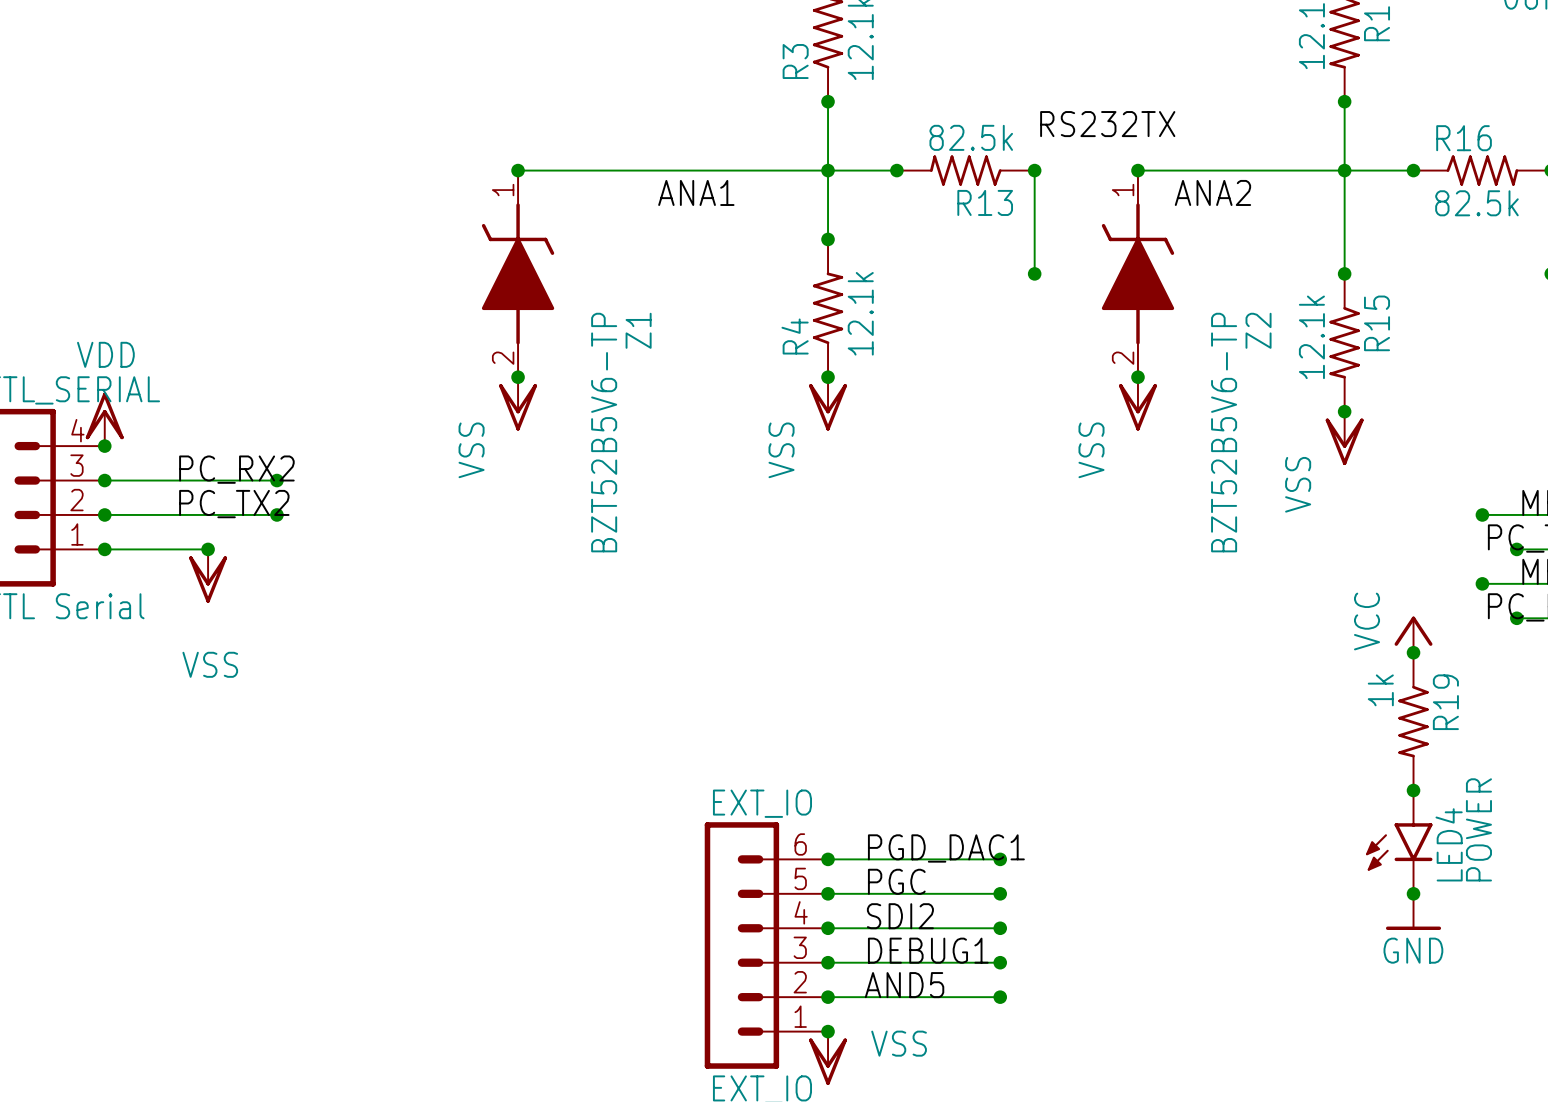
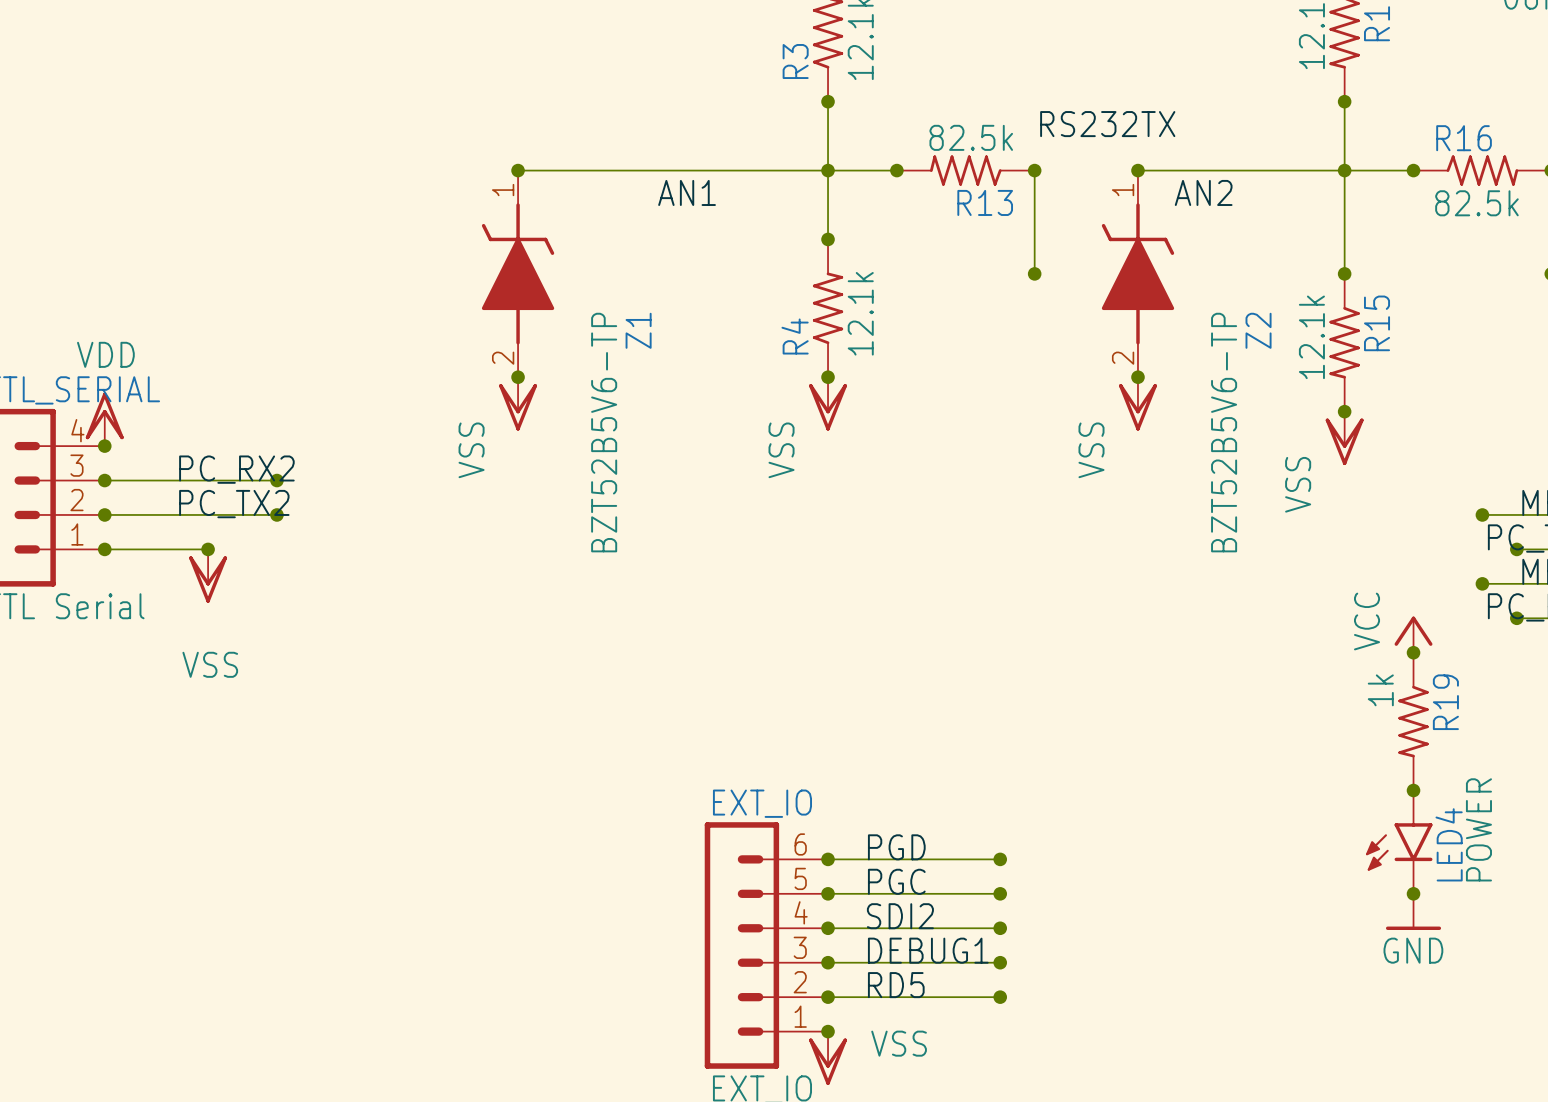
label: ANA1 (696, 192) -> AN1 (687, 192)
label: ANA2 (1212, 192) -> AN2 (1203, 192)
label: PGD_DAC1 (946, 848) -> PGD (896, 847)
label: AND5 (904, 985) -> RD5 (896, 985)

